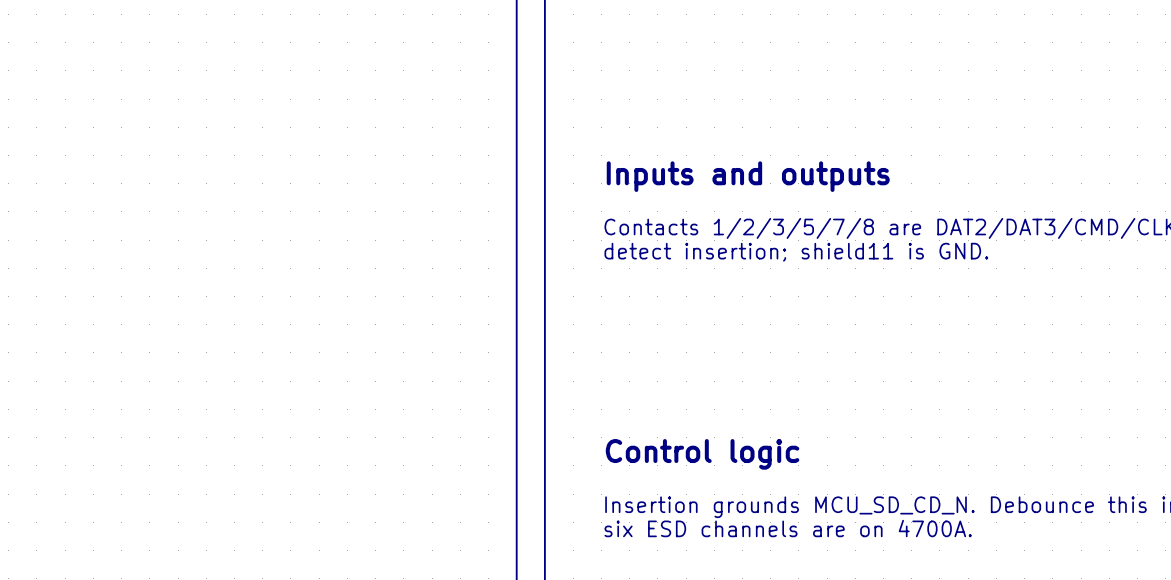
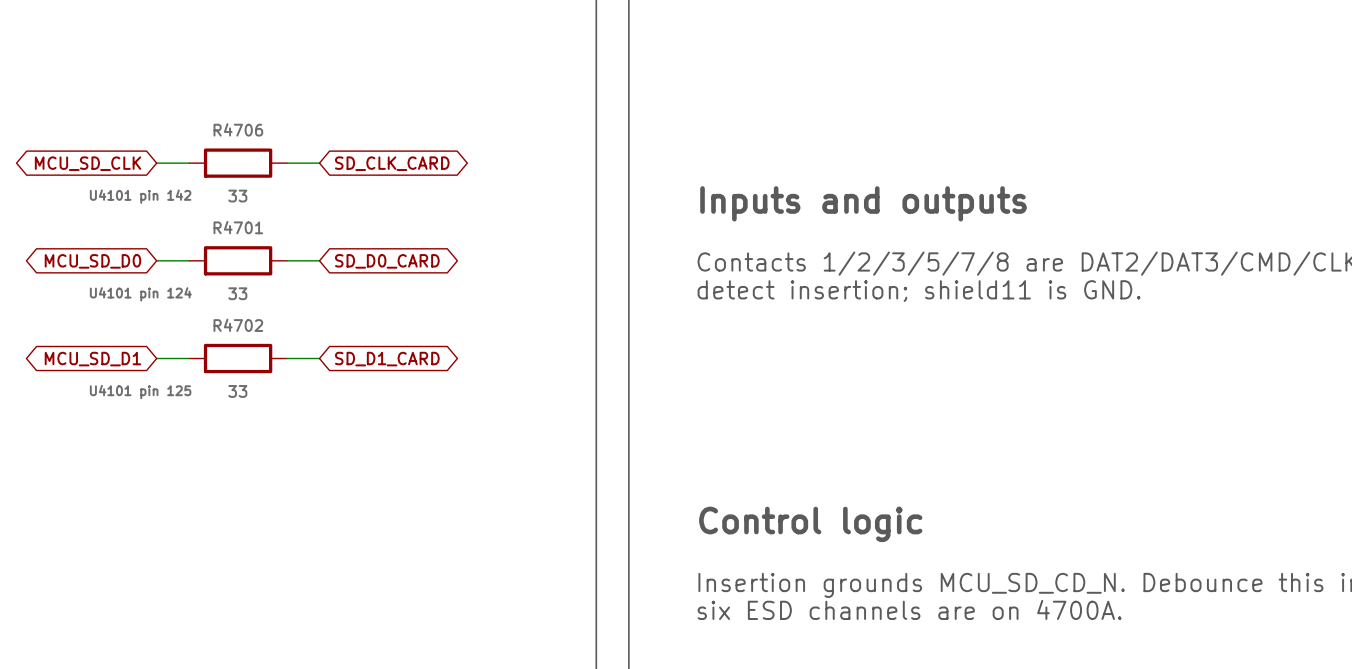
global label: none -> MCU_SD_CLK (88, 163)
wire: none -> (156, 163) (189, 163)
R4706: none -> 33 (238, 163)
wire: none -> (286, 163) (319, 163)
global label: none -> SD_CLK_CARD (392, 163)
global label: none -> MCU_SD_D0 (92, 261)
wire: none -> (156, 260) (189, 260)
R4701: none -> 33 (238, 260)
wire: none -> (286, 260) (319, 260)
global label: none -> SD_D0_CARD (387, 261)
wire: none -> (156, 358) (189, 358)
R4702: none -> 33 (238, 358)
wire: none -> (286, 358) (319, 358)
global label: none -> MCU_SD_D1 (92, 359)
global label: none -> SD_D1_CARD (387, 359)

